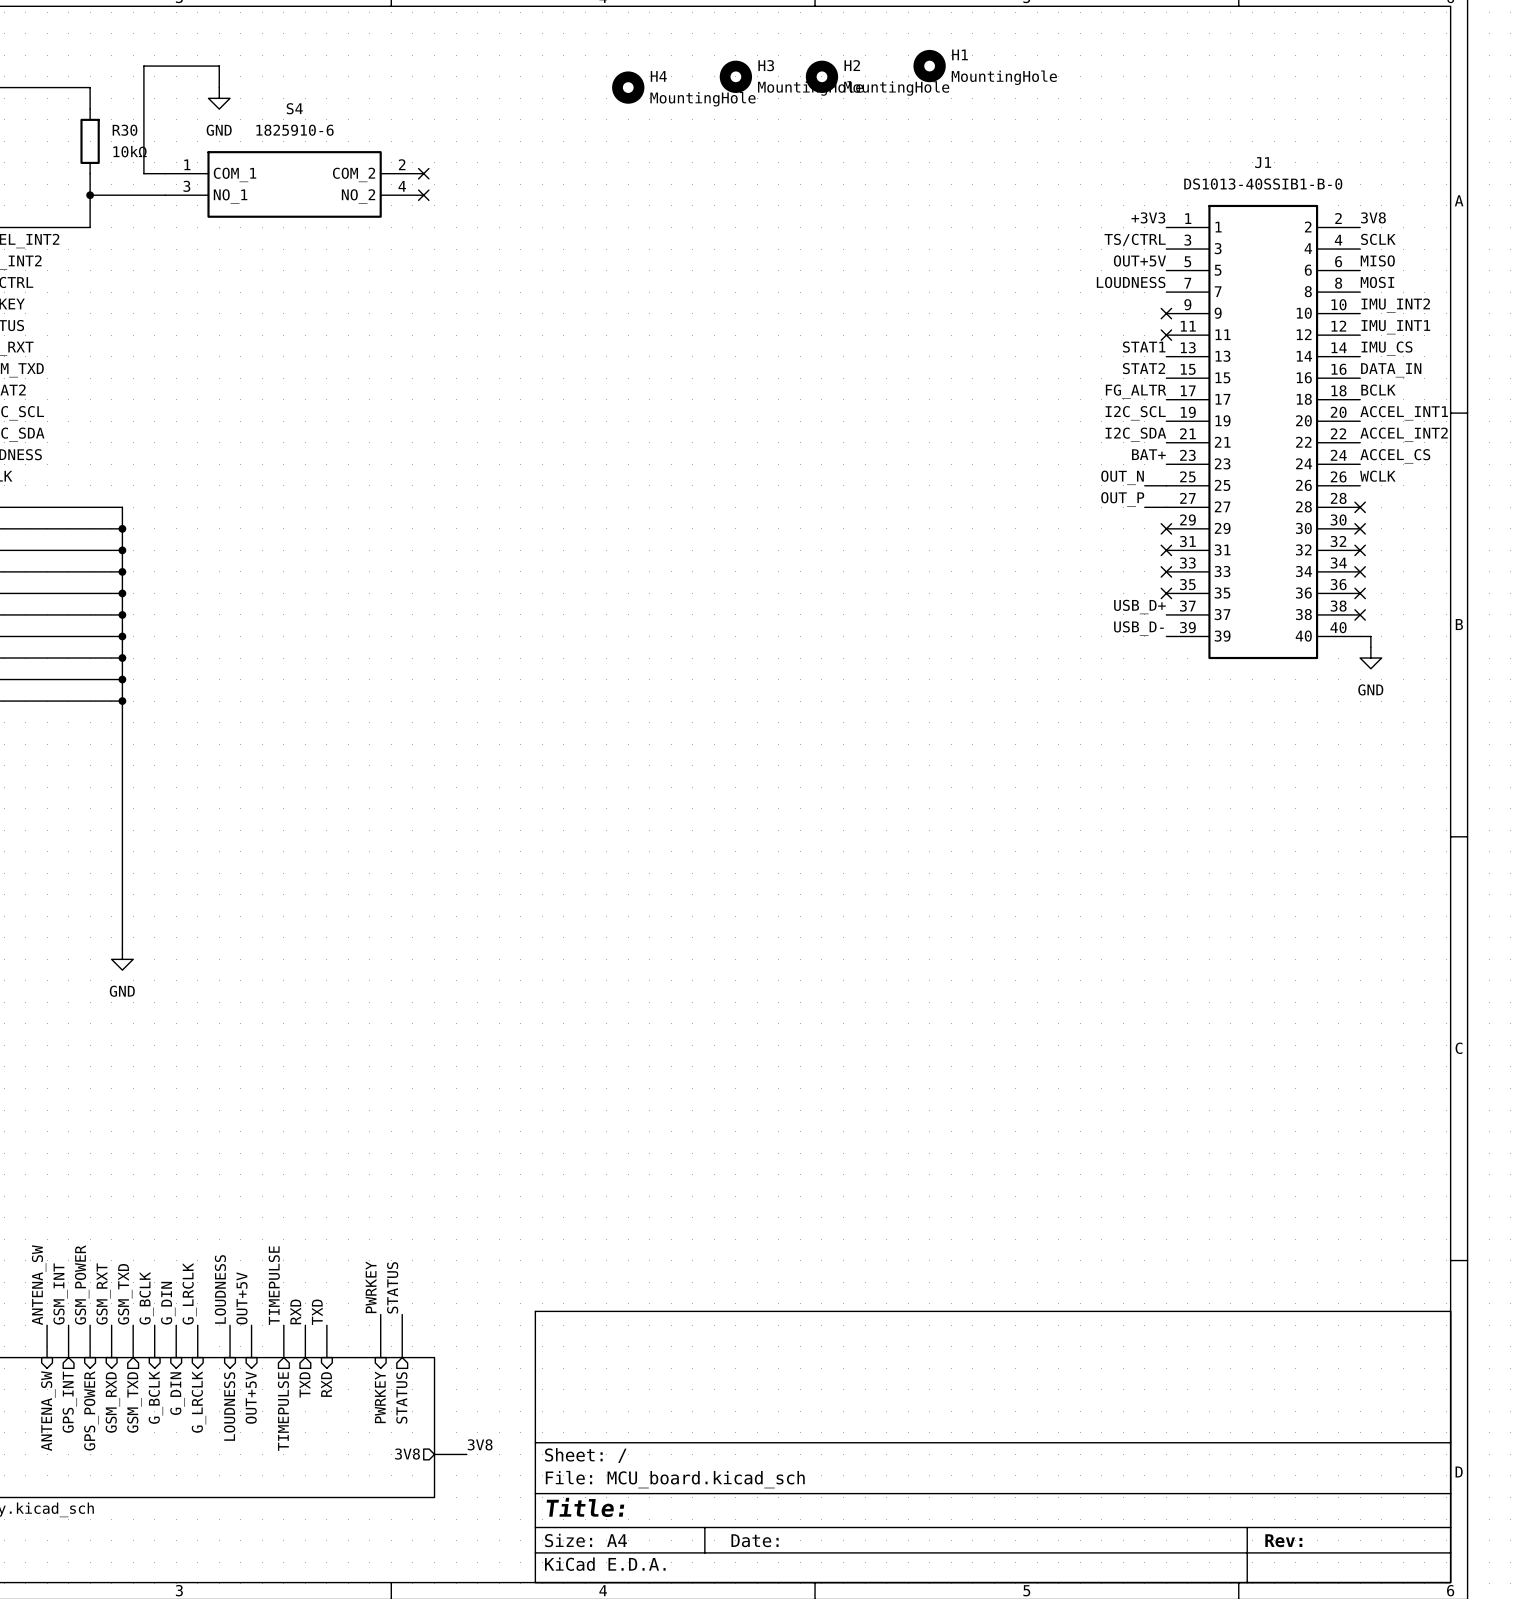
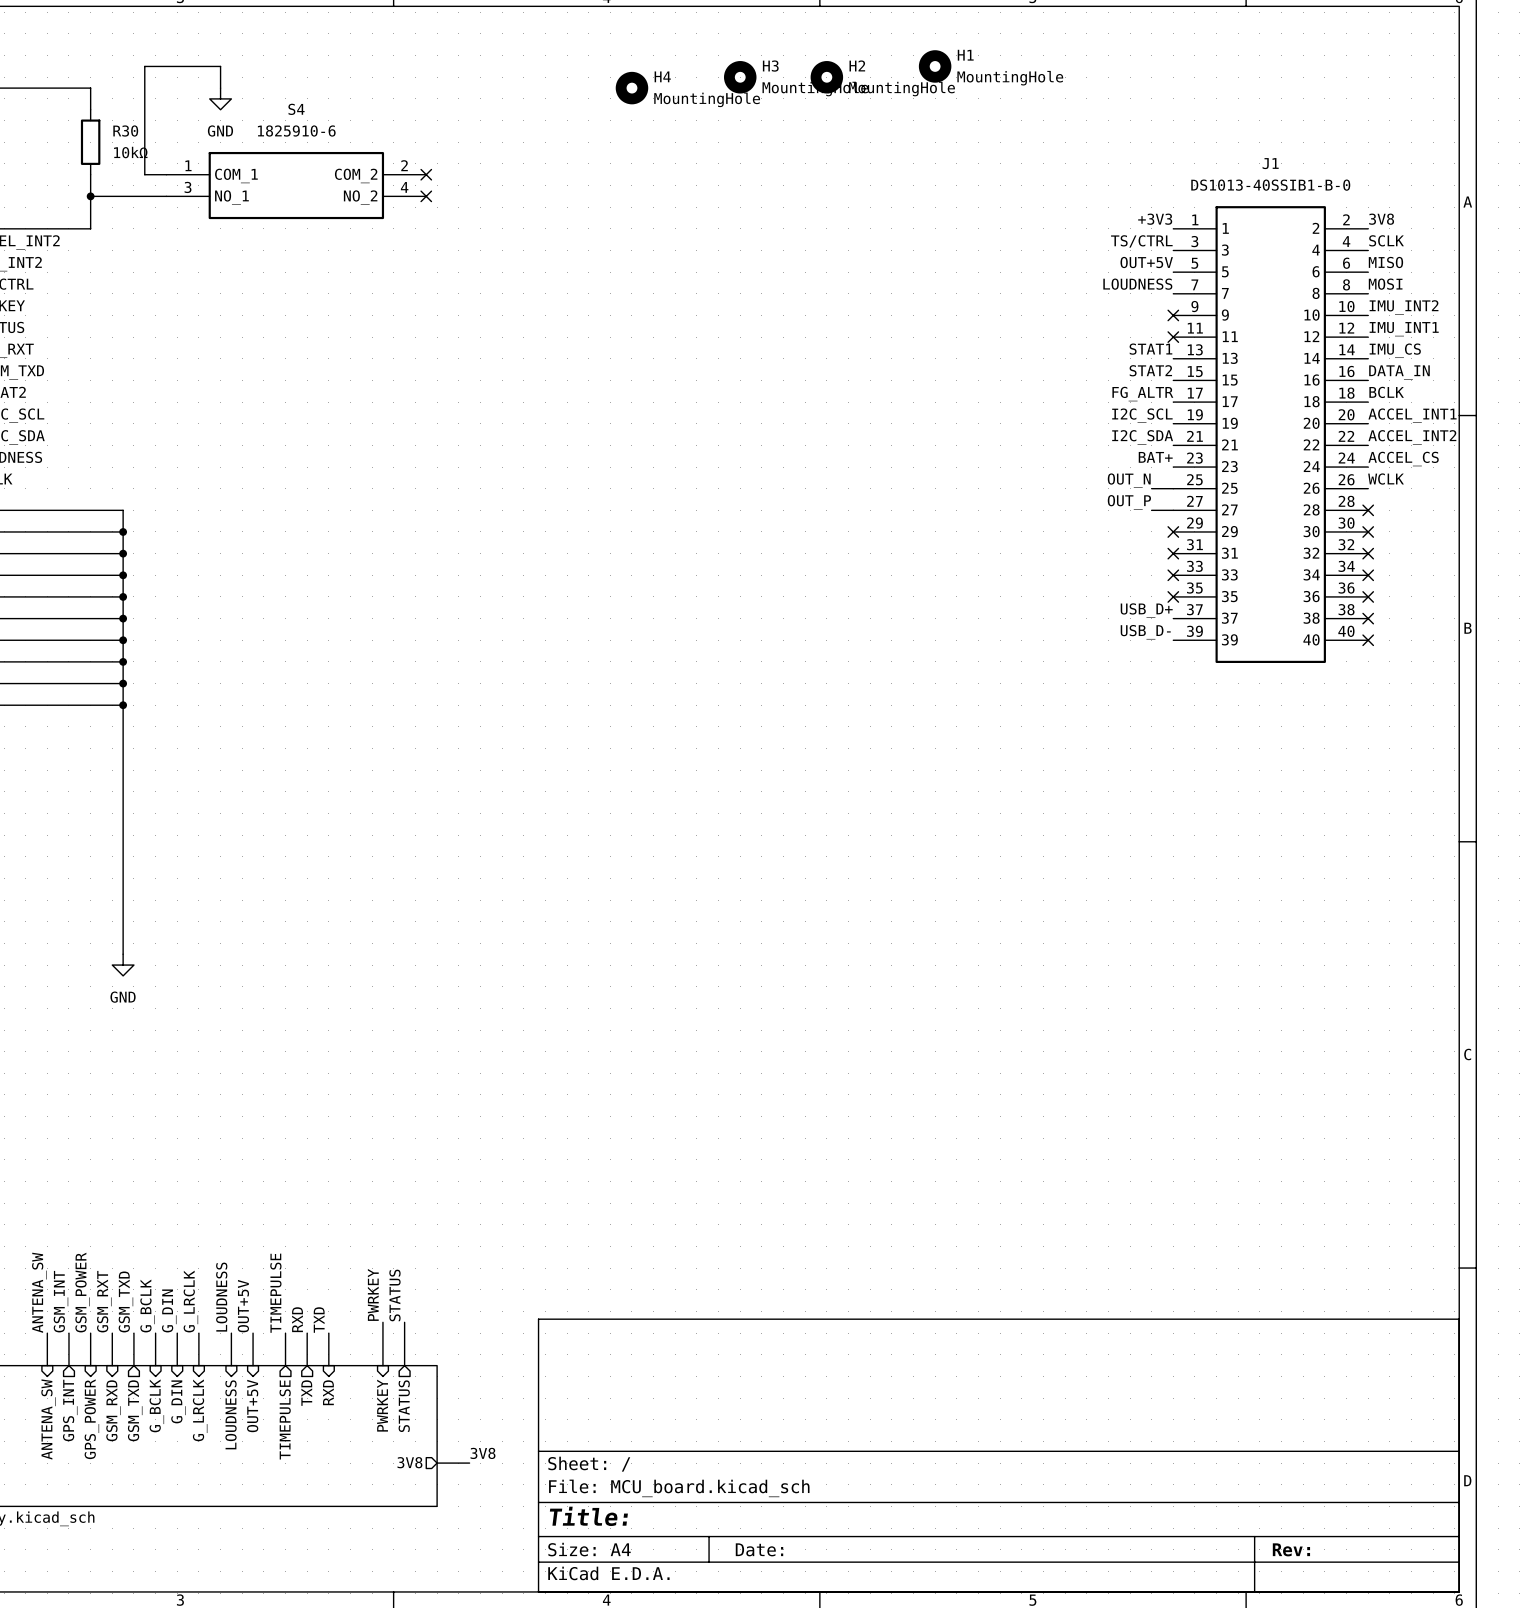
wire: (1360, 636) (1370, 636) (1370, 647) -> none
no-connect mark: none -> (1368, 640)
power symbol: GND (1370, 658) -> none

